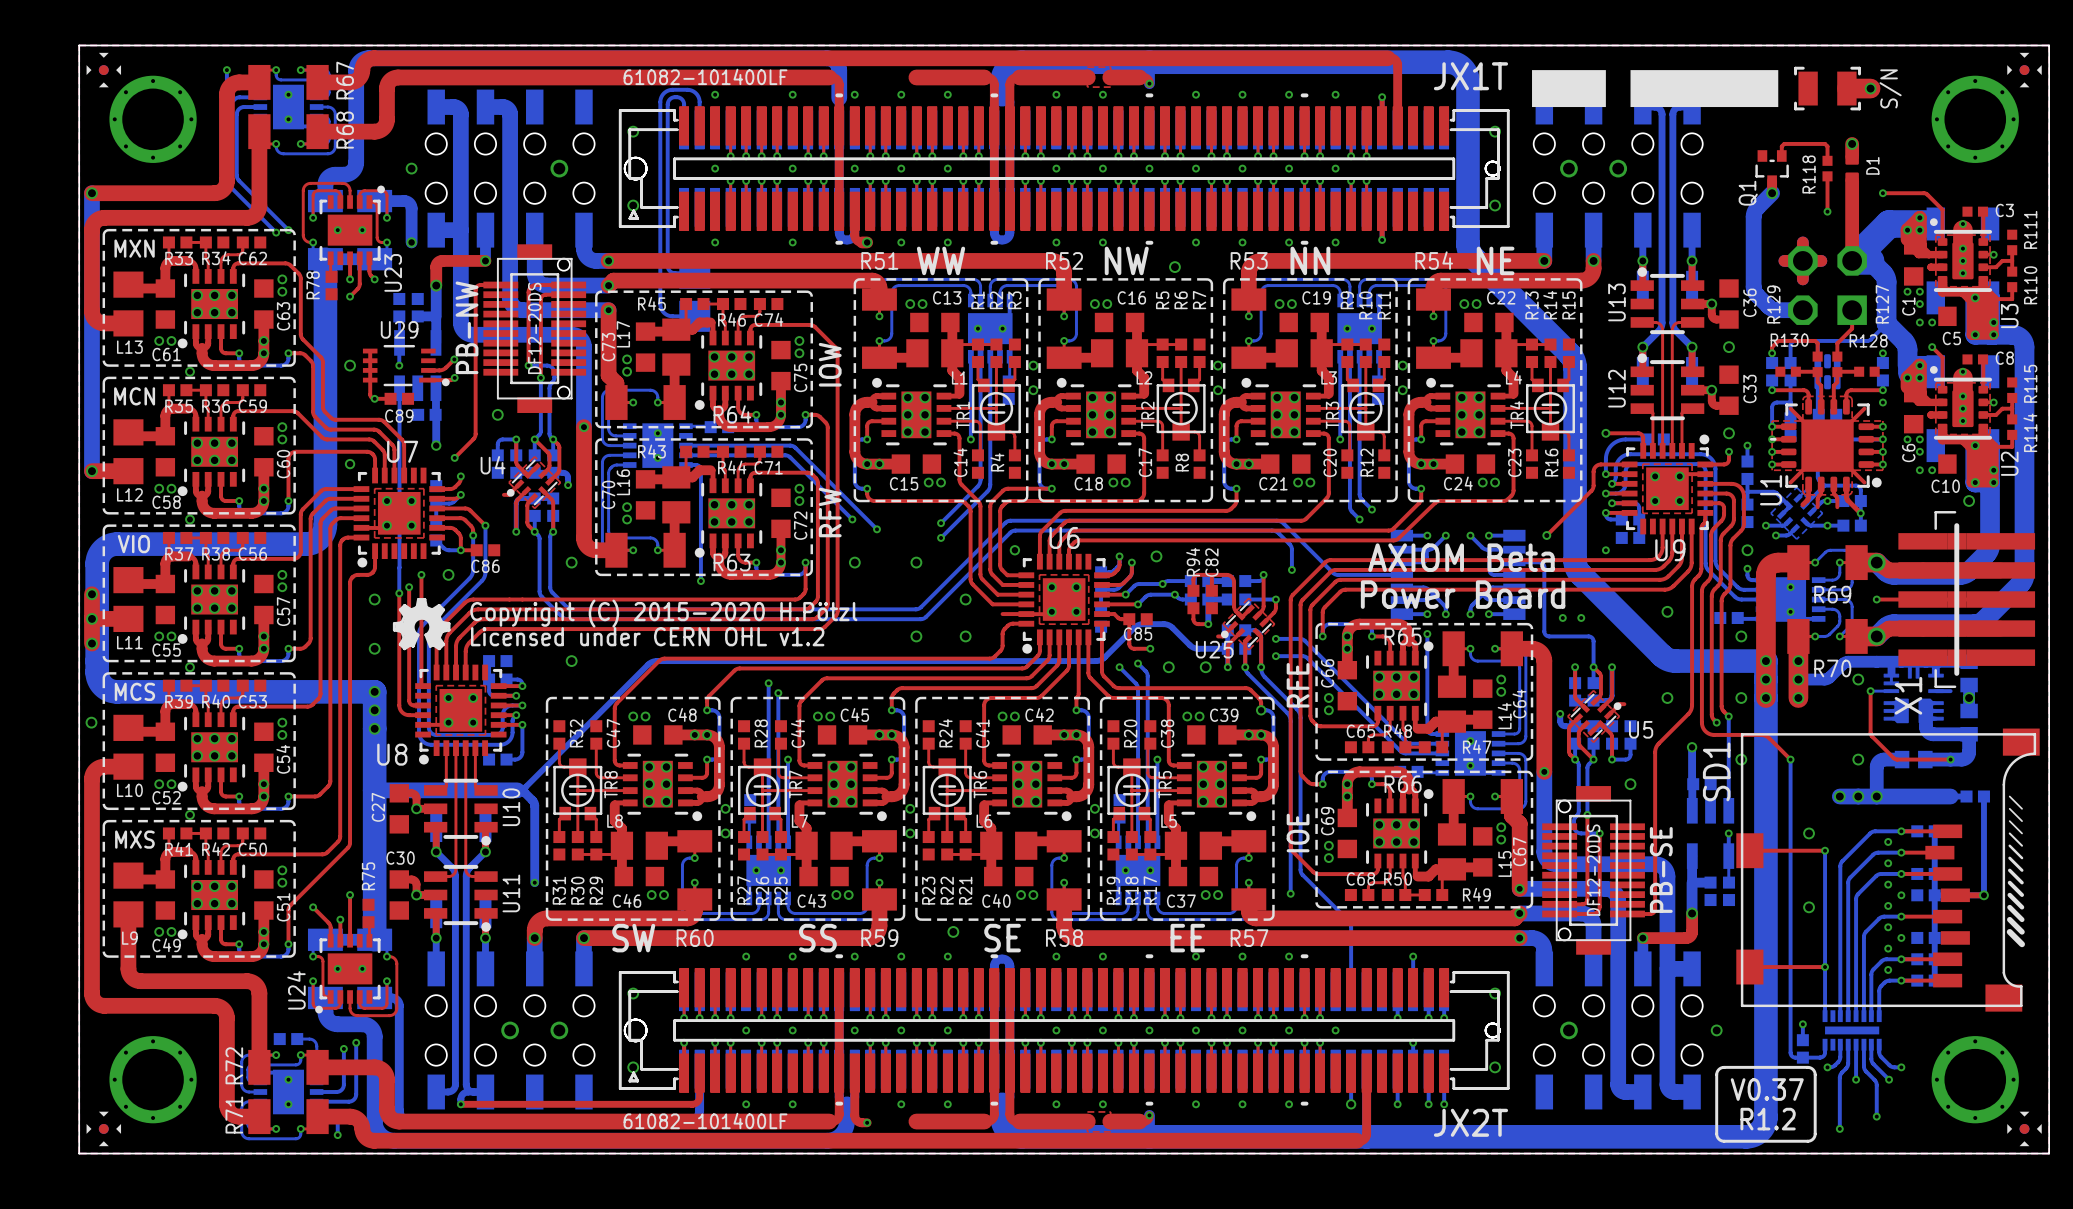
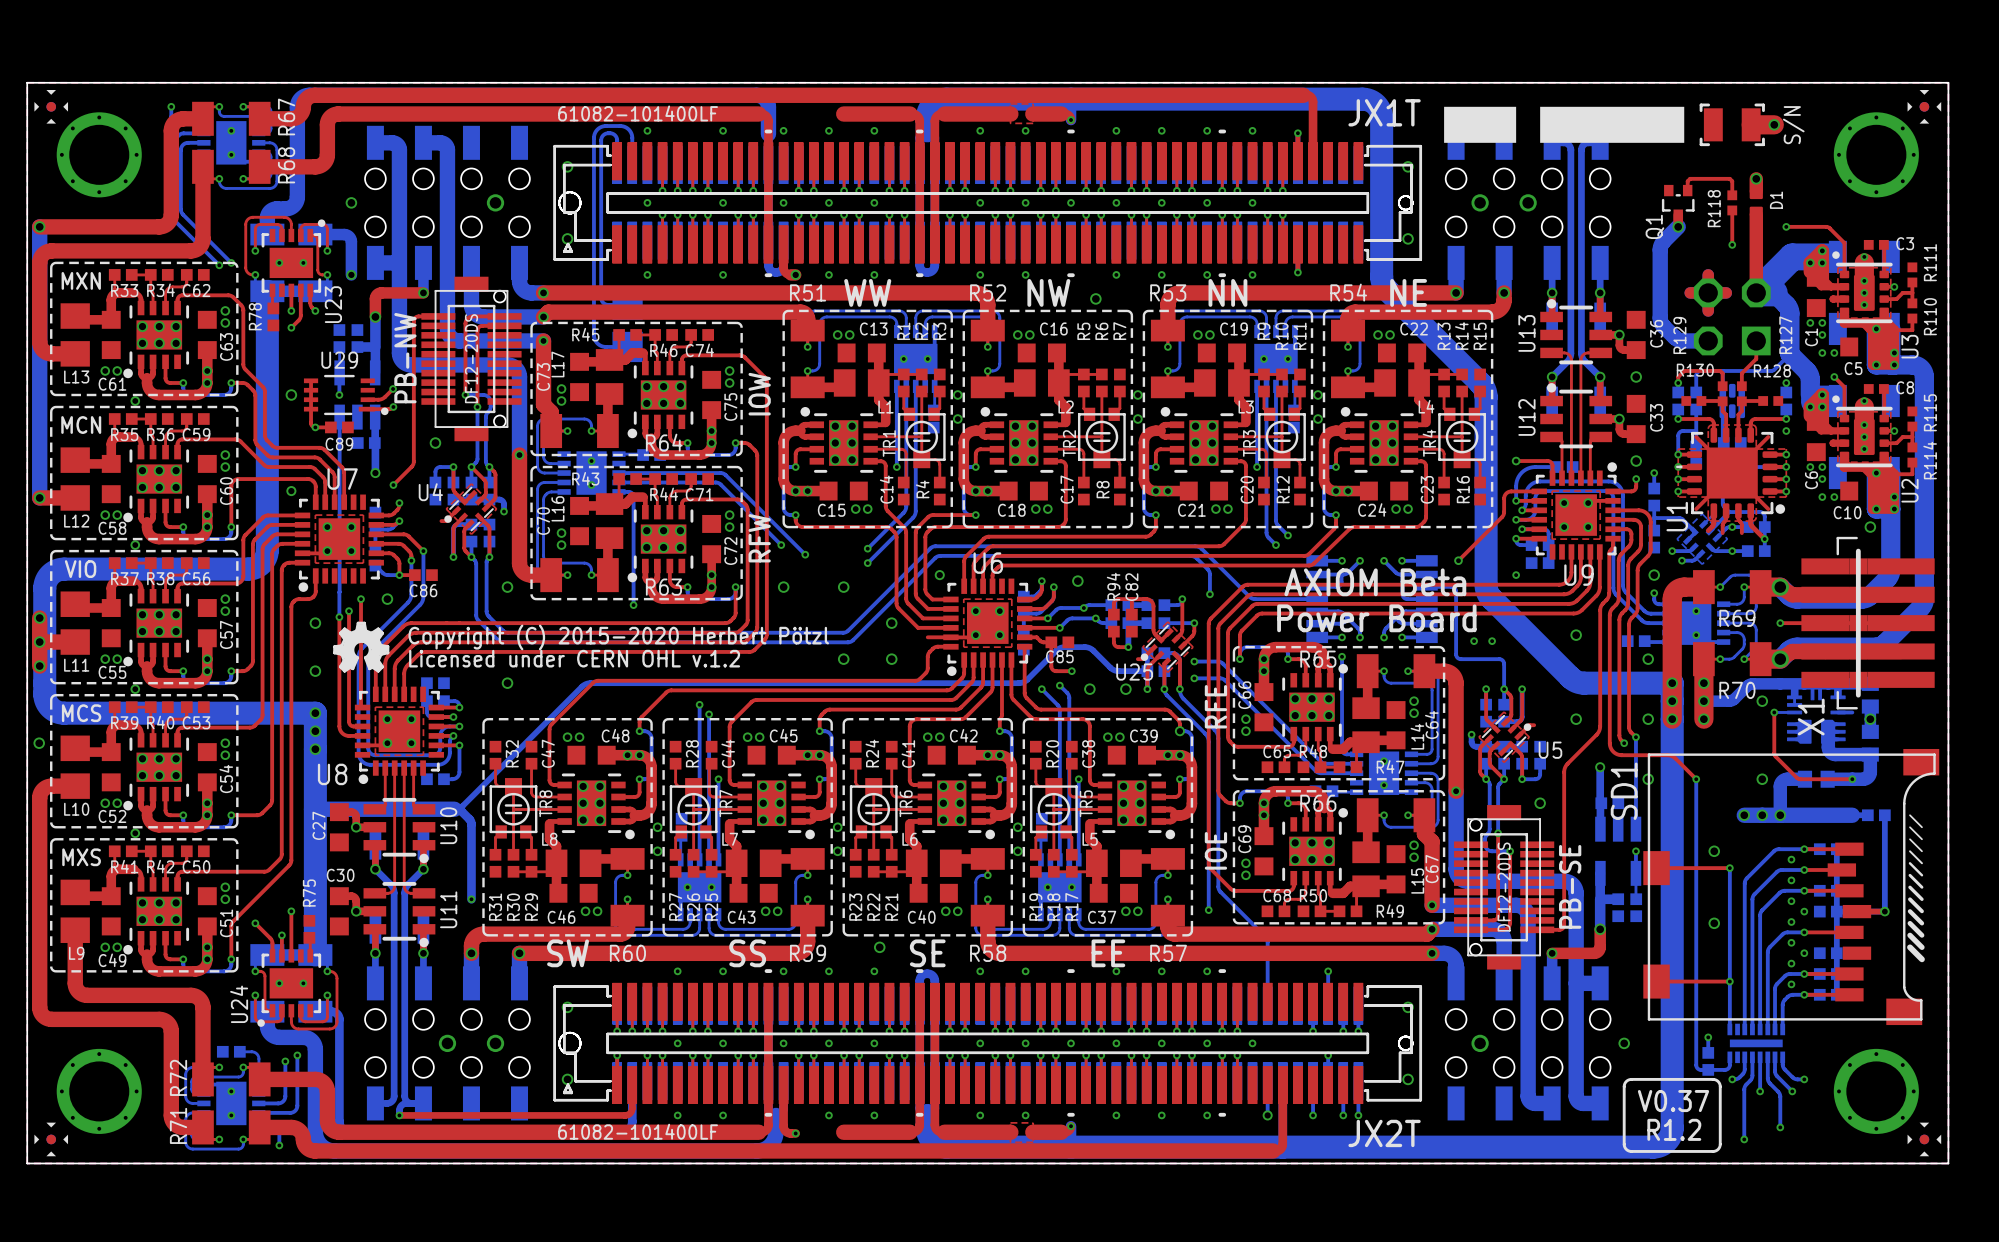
text: Copyright (C) 2015-2020 H.Pötzl (663, 613) -> Copyright (C) 2015-2020 Herbert Pötzl (618, 637)
text: Licensed under CERN OHL v1.2 (647, 636) -> Licensed under CERN OHL v.1.2 (574, 658)

